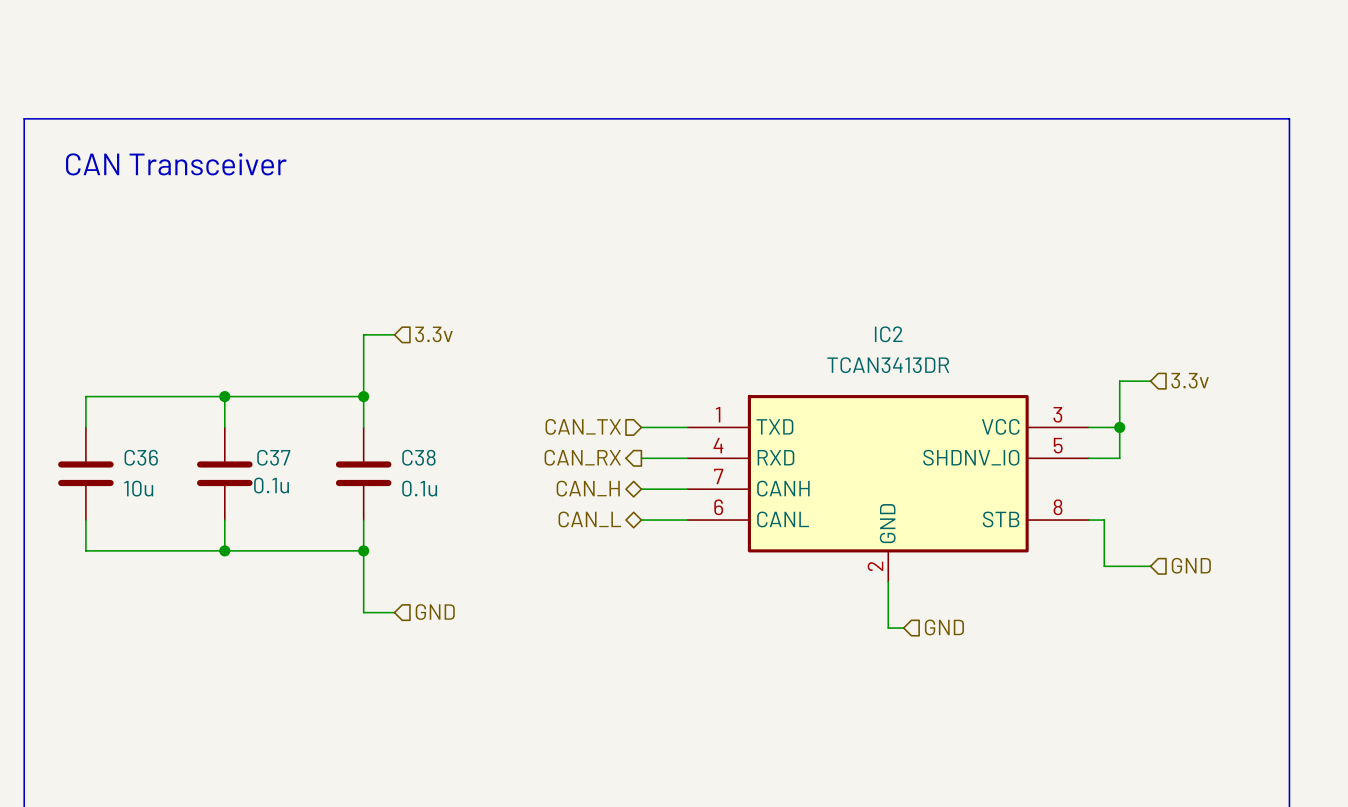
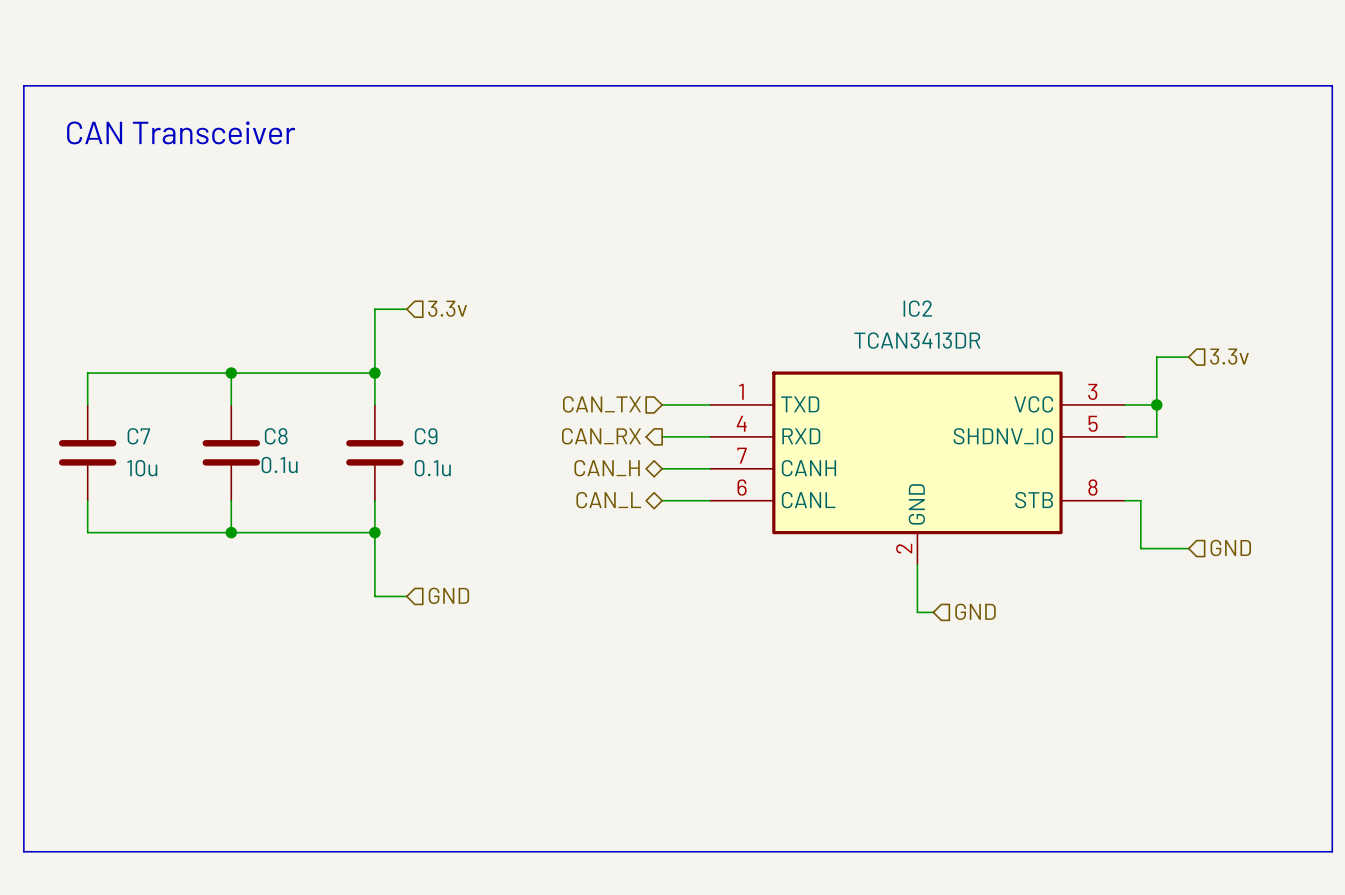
C36 name: C36 (141, 457) -> C7 (138, 436)
C37 name: C37 (273, 457) -> C8 (276, 436)
C38 name: C38 (418, 457) -> C9 (426, 436)

